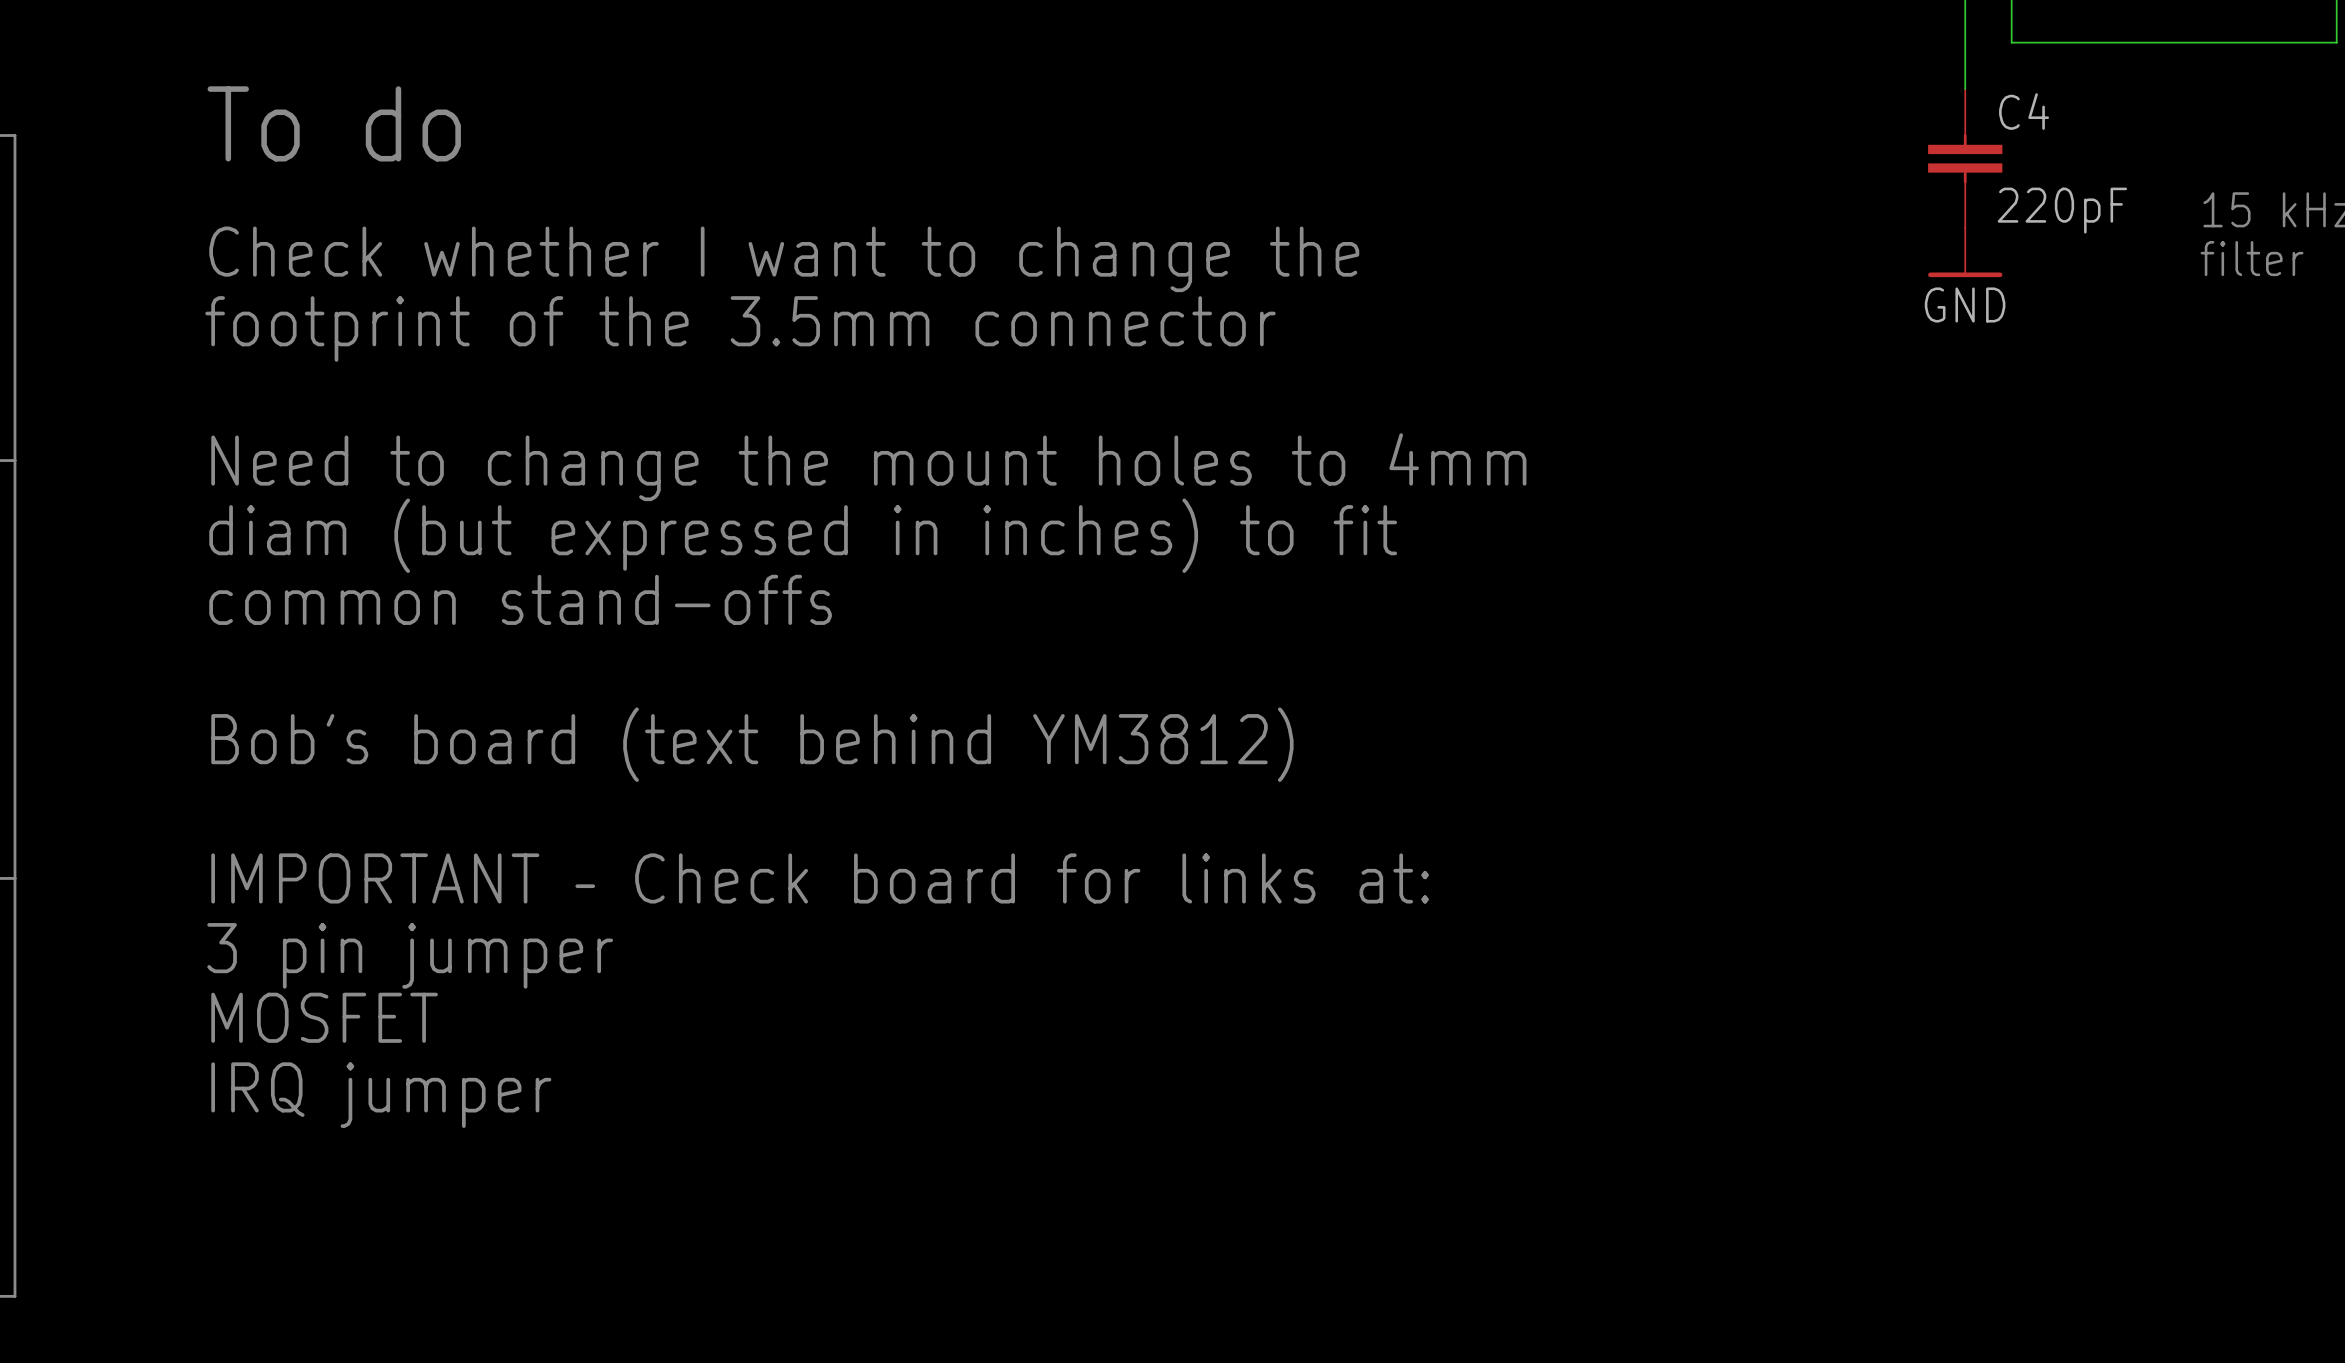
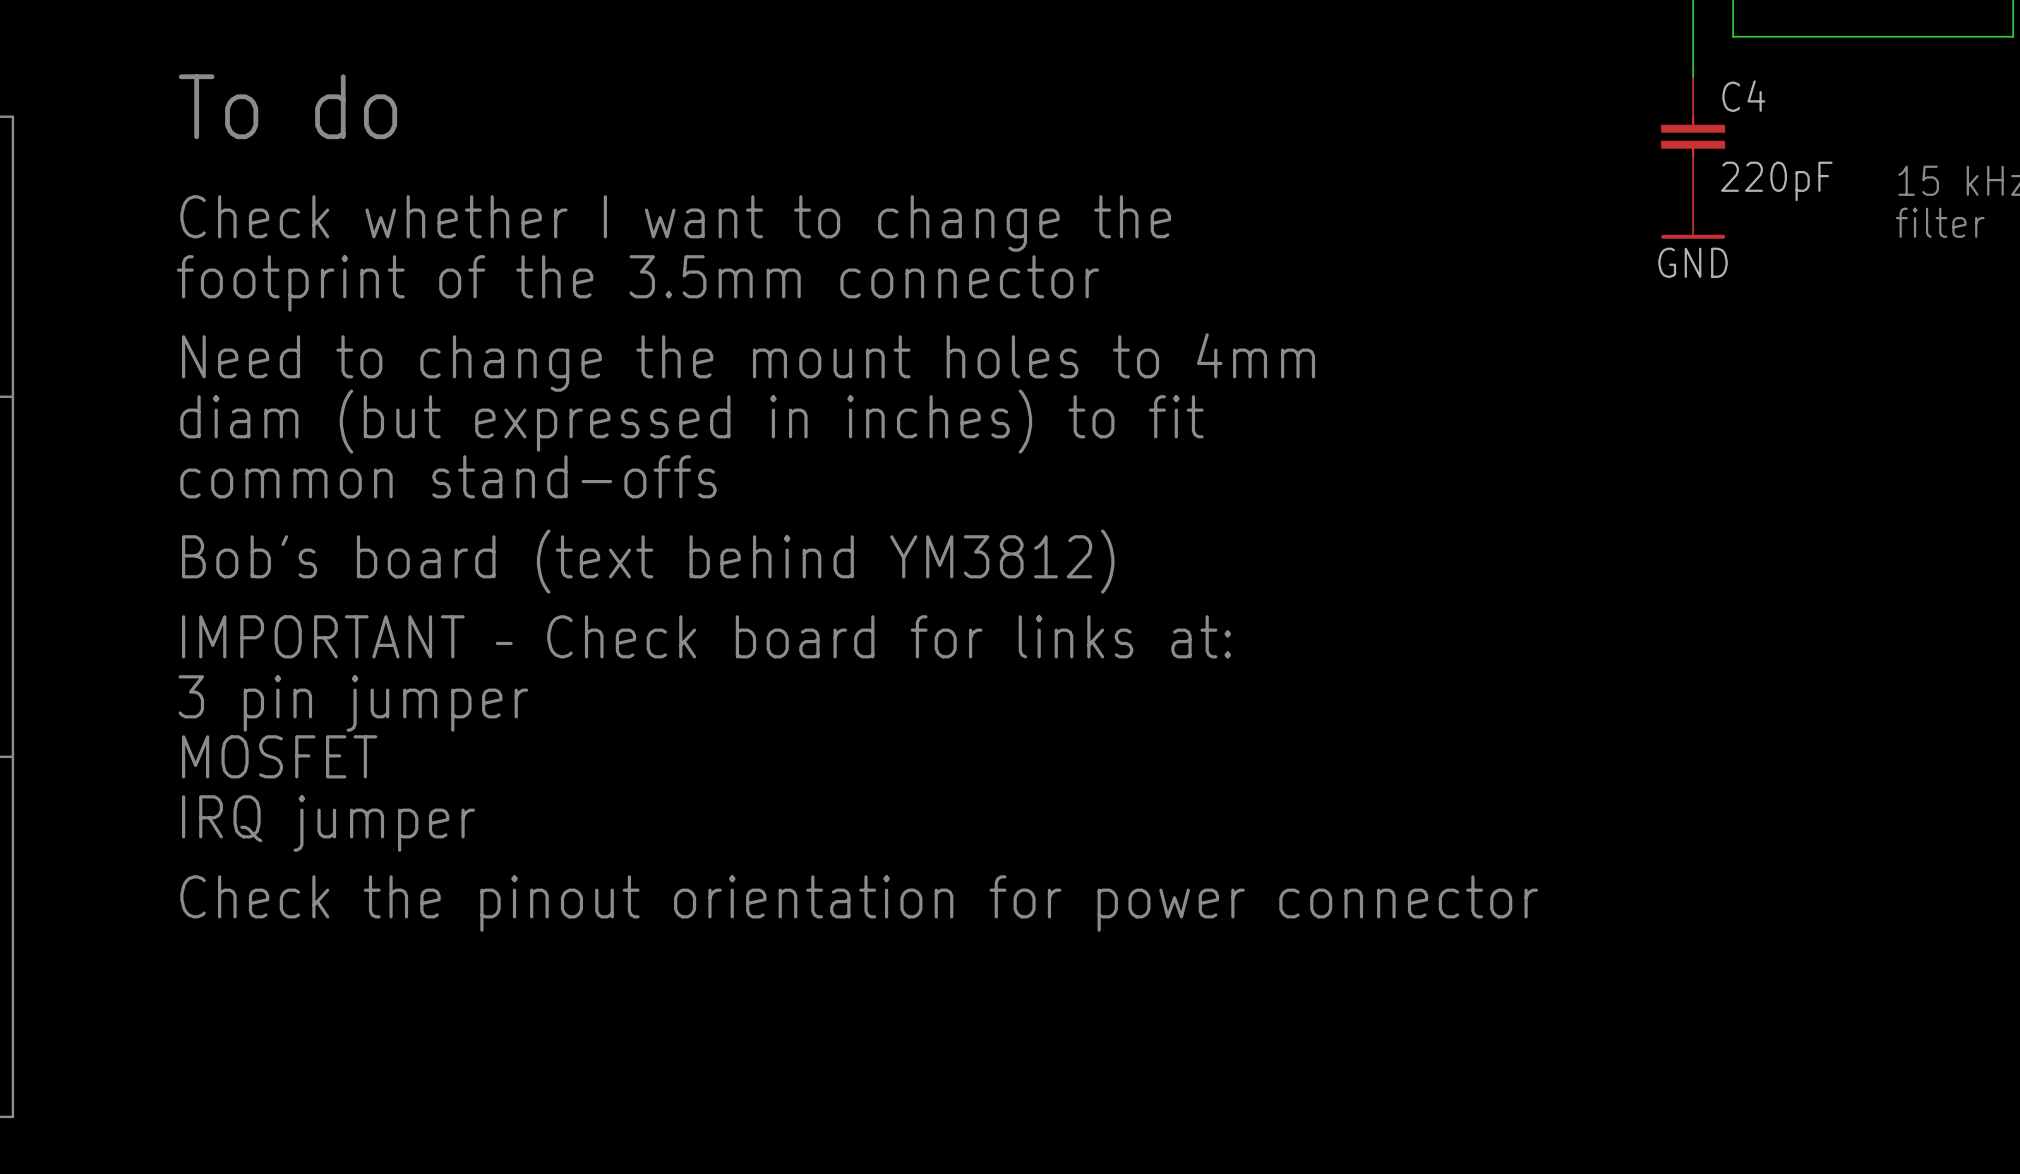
text position: Need to change the mount holes to 4mm (868, 467) -> Need to change the mount holes to 4mm (748, 362)
text position: diam (but expressed in inches) to fit (803, 535) -> diam (but expressed in inches) to fit (691, 421)
text position: common stand-offs (520, 599) -> common stand-offs (448, 476)
text: none -> Bob's board (text behind YM3812) (648, 561)
text: Bob's board (text behind YM3812) (752, 744) -> IMPORTANT – Check board for links at: (706, 636)
text: none -> 3 pin jumper (353, 703)
text: IMPORTANT – Check board for links at: (820, 878) -> MOSFET (279, 756)
text: 3 pin jumper (410, 955) -> IRQ jumper (328, 823)
text: MOSFET (324, 1017) -> none
text: none -> Check the pinout orientation for power connector (859, 903)
text: IRQ jumper (381, 1095) -> none

